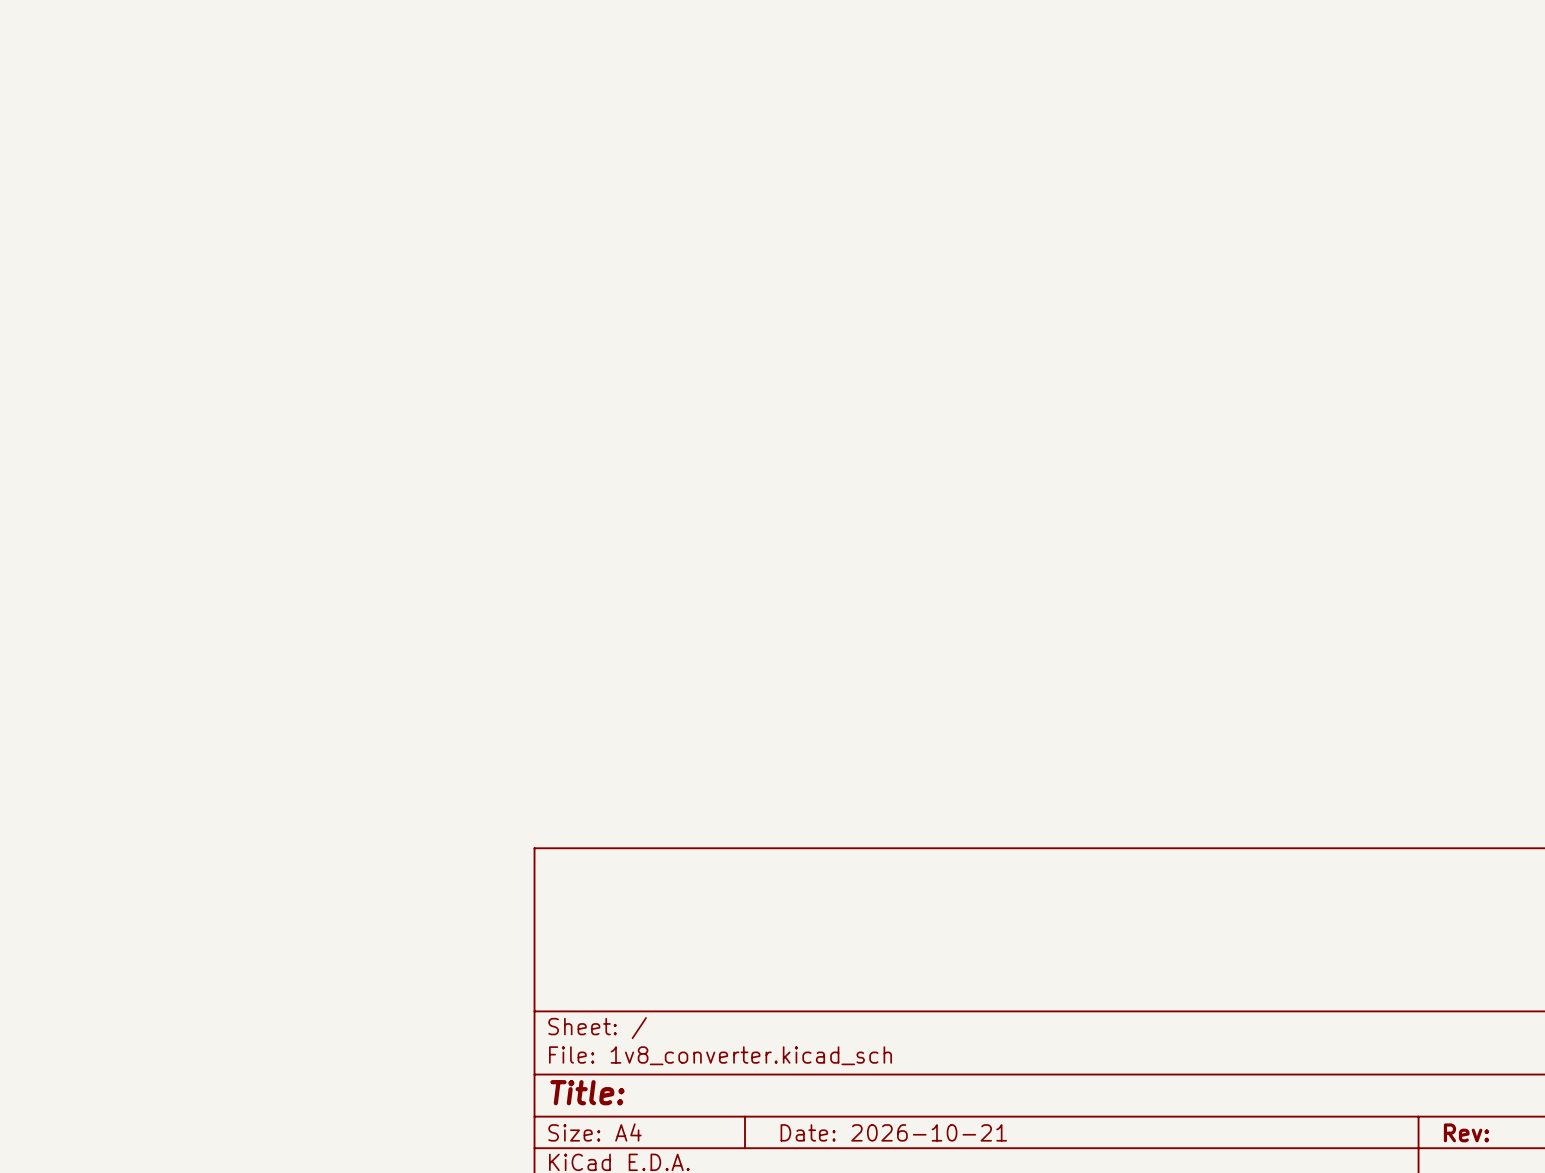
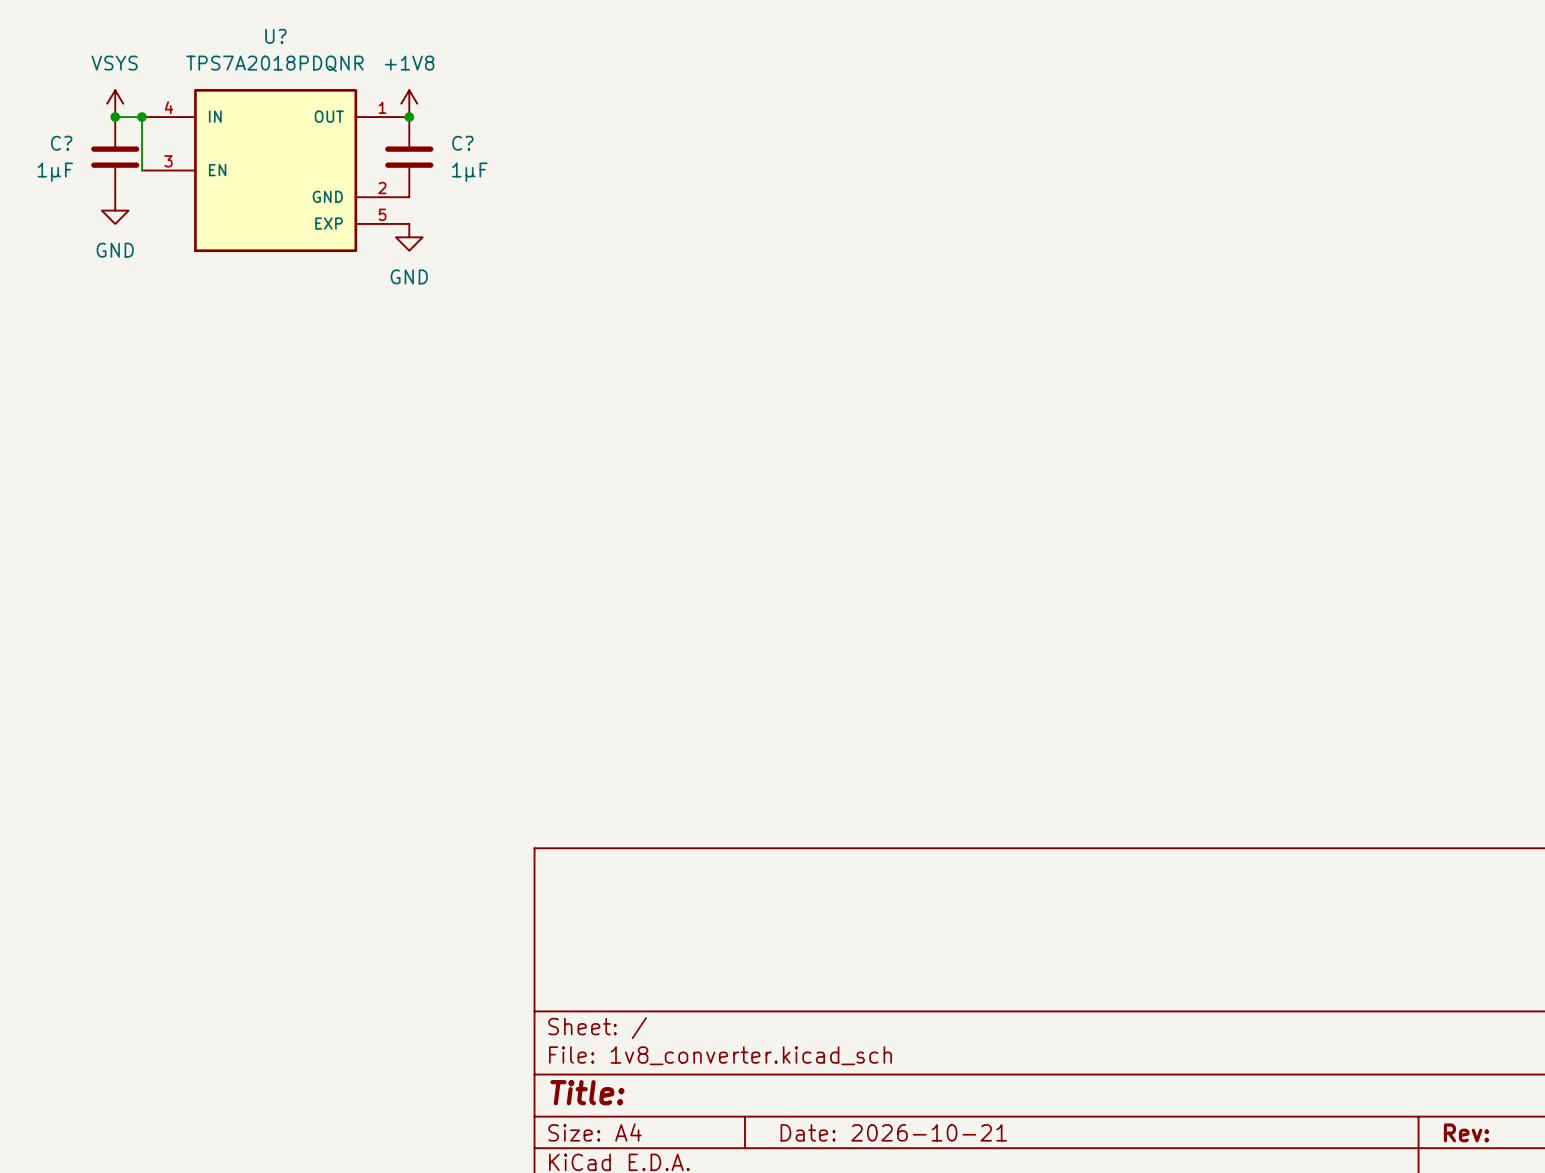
power symbol: none -> VSYS (115, 103)
power symbol: none -> +1V8 (409, 103)
wire: none -> (115, 117) (141, 117) (141, 170)
junction: none -> (115, 117)
junction: none -> (141, 117)
junction: none -> (409, 117)
C?: none -> 1µF (115, 157)
C?: none -> 1µF (409, 157)
U?: none -> TPS7A2018PDQNR (275, 170)
power symbol: none -> GND (115, 210)
power symbol: none -> GND (409, 237)

